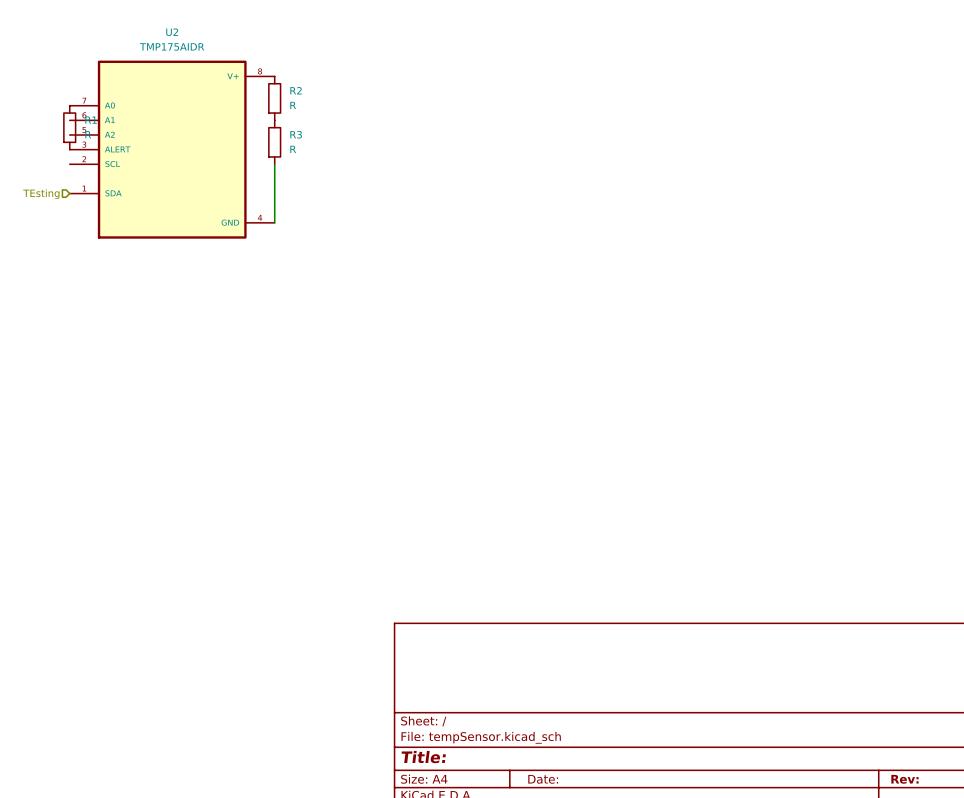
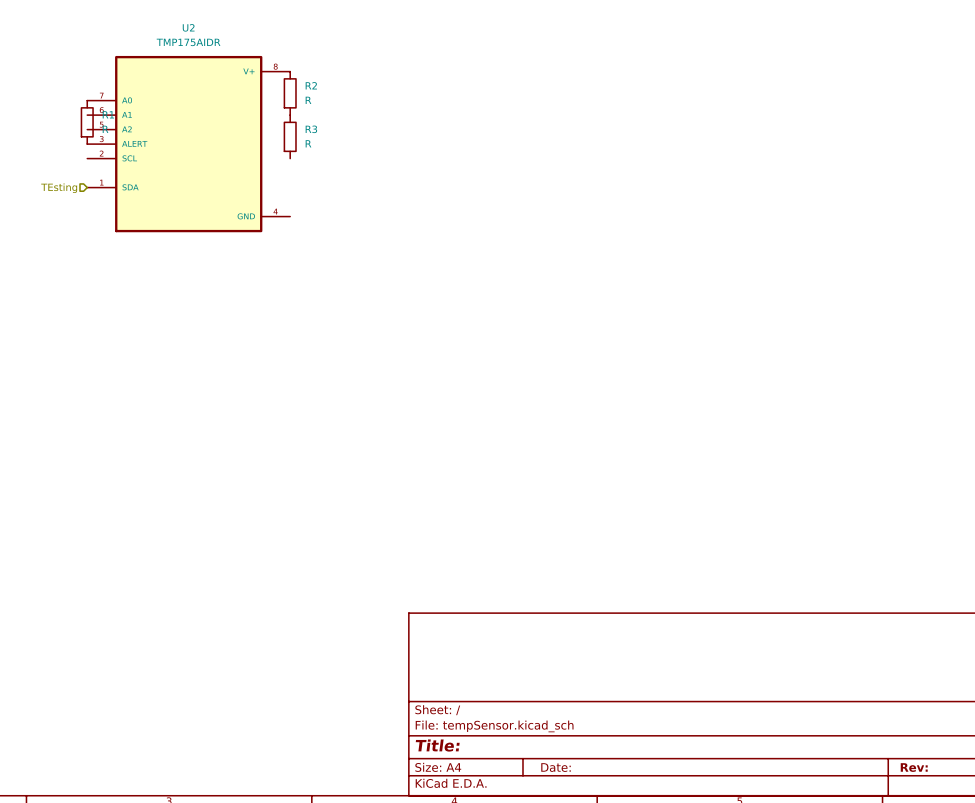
wire: (274, 164) (274, 222) -> none

